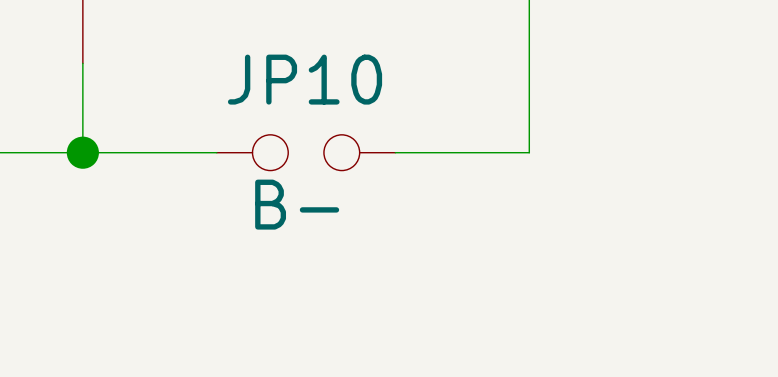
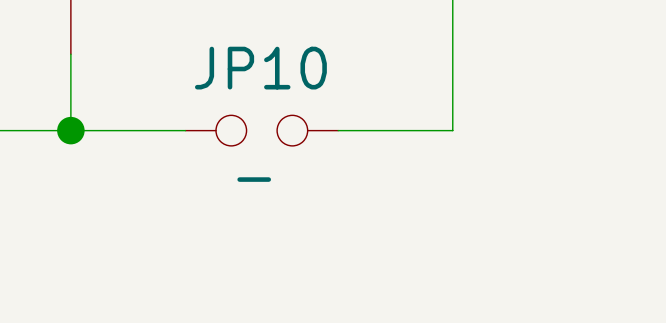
JP10 value: B- (297, 204) -> - (254, 179)

